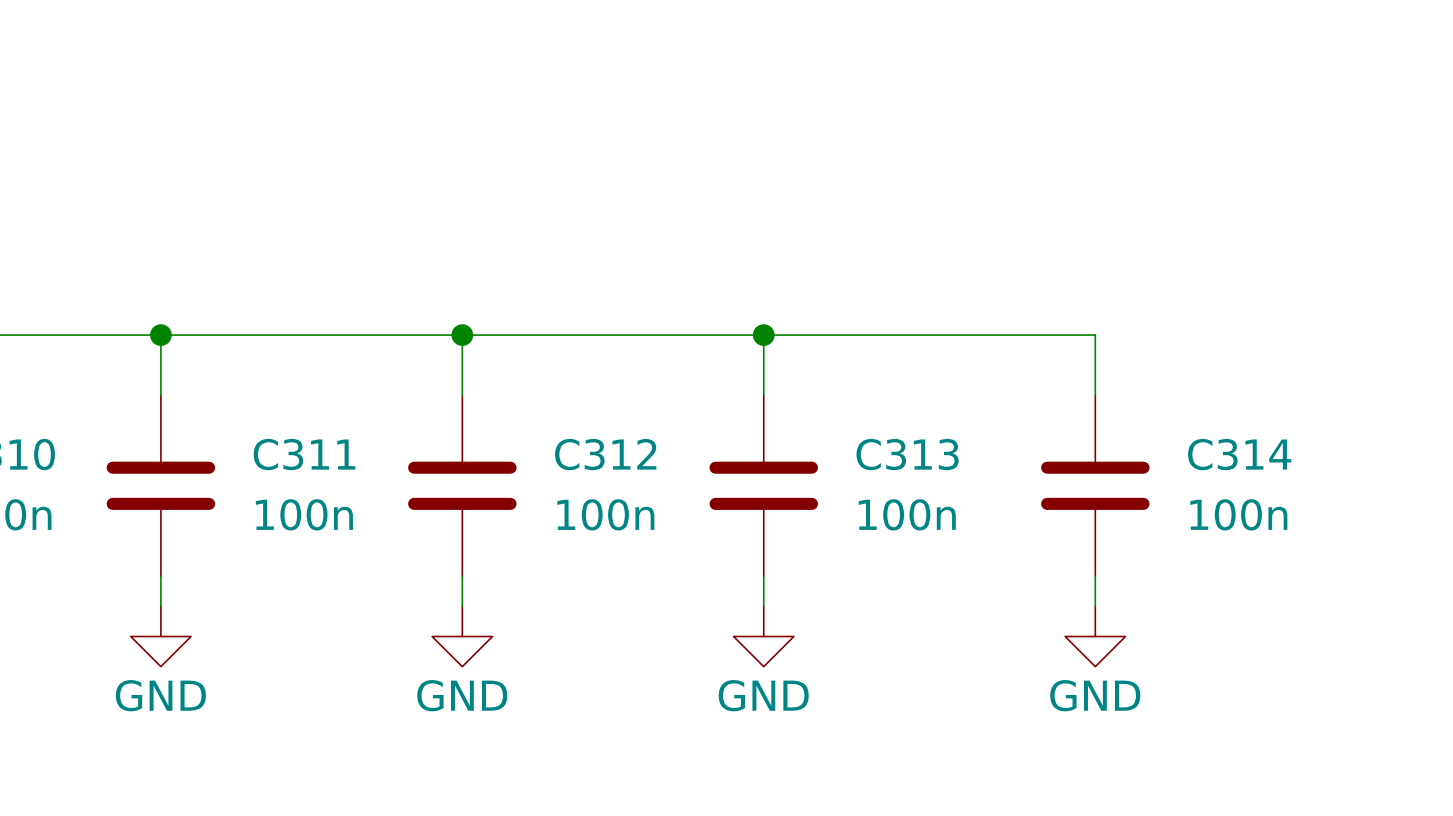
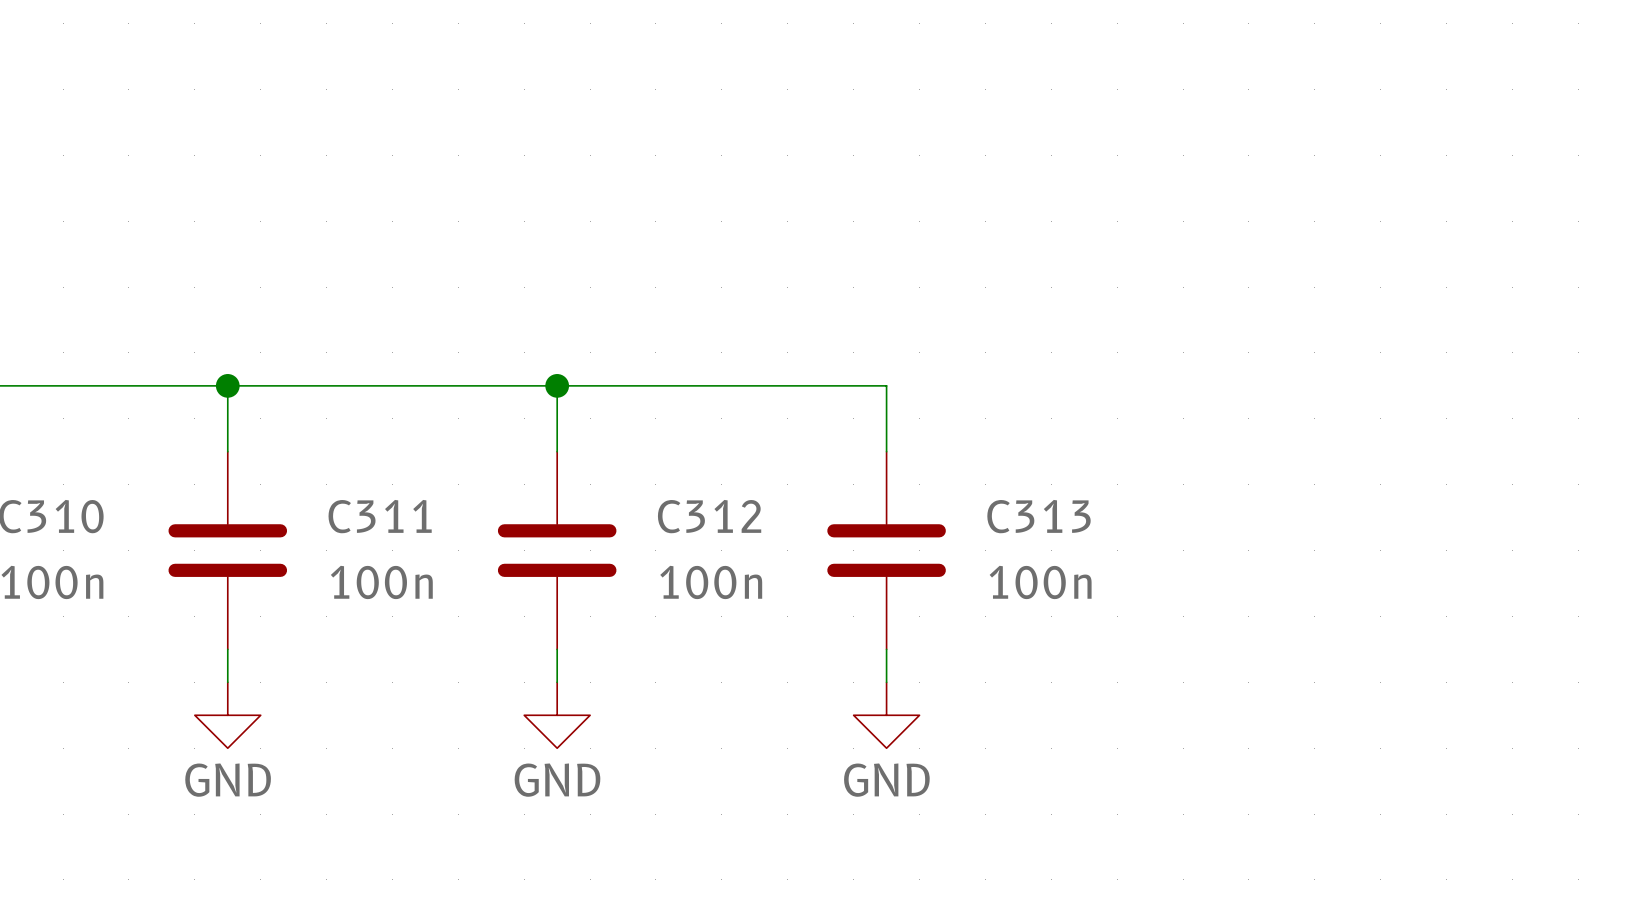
wire: (763, 335) (1095, 335) (1095, 395) -> none
junction: (763, 335) -> none
C314: 100n (1095, 485) -> none
wire: (1095, 576) (1095, 606) -> none
power symbol: GND (1095, 636) -> none

